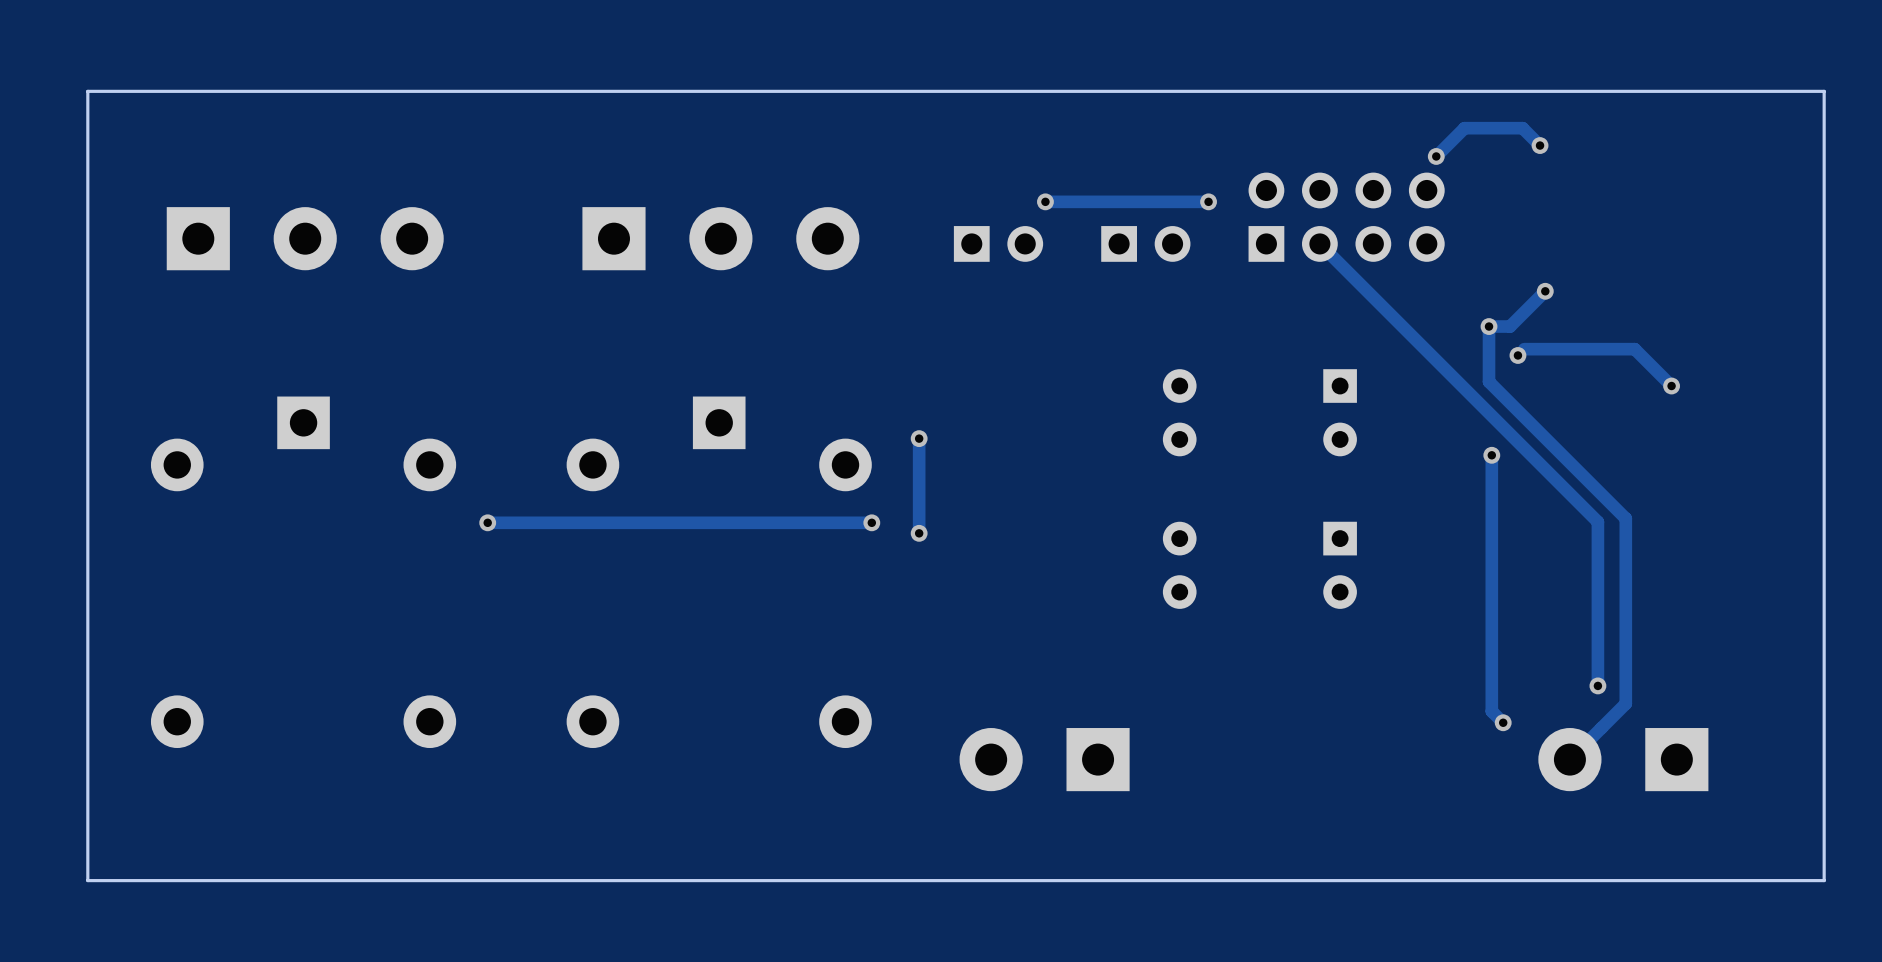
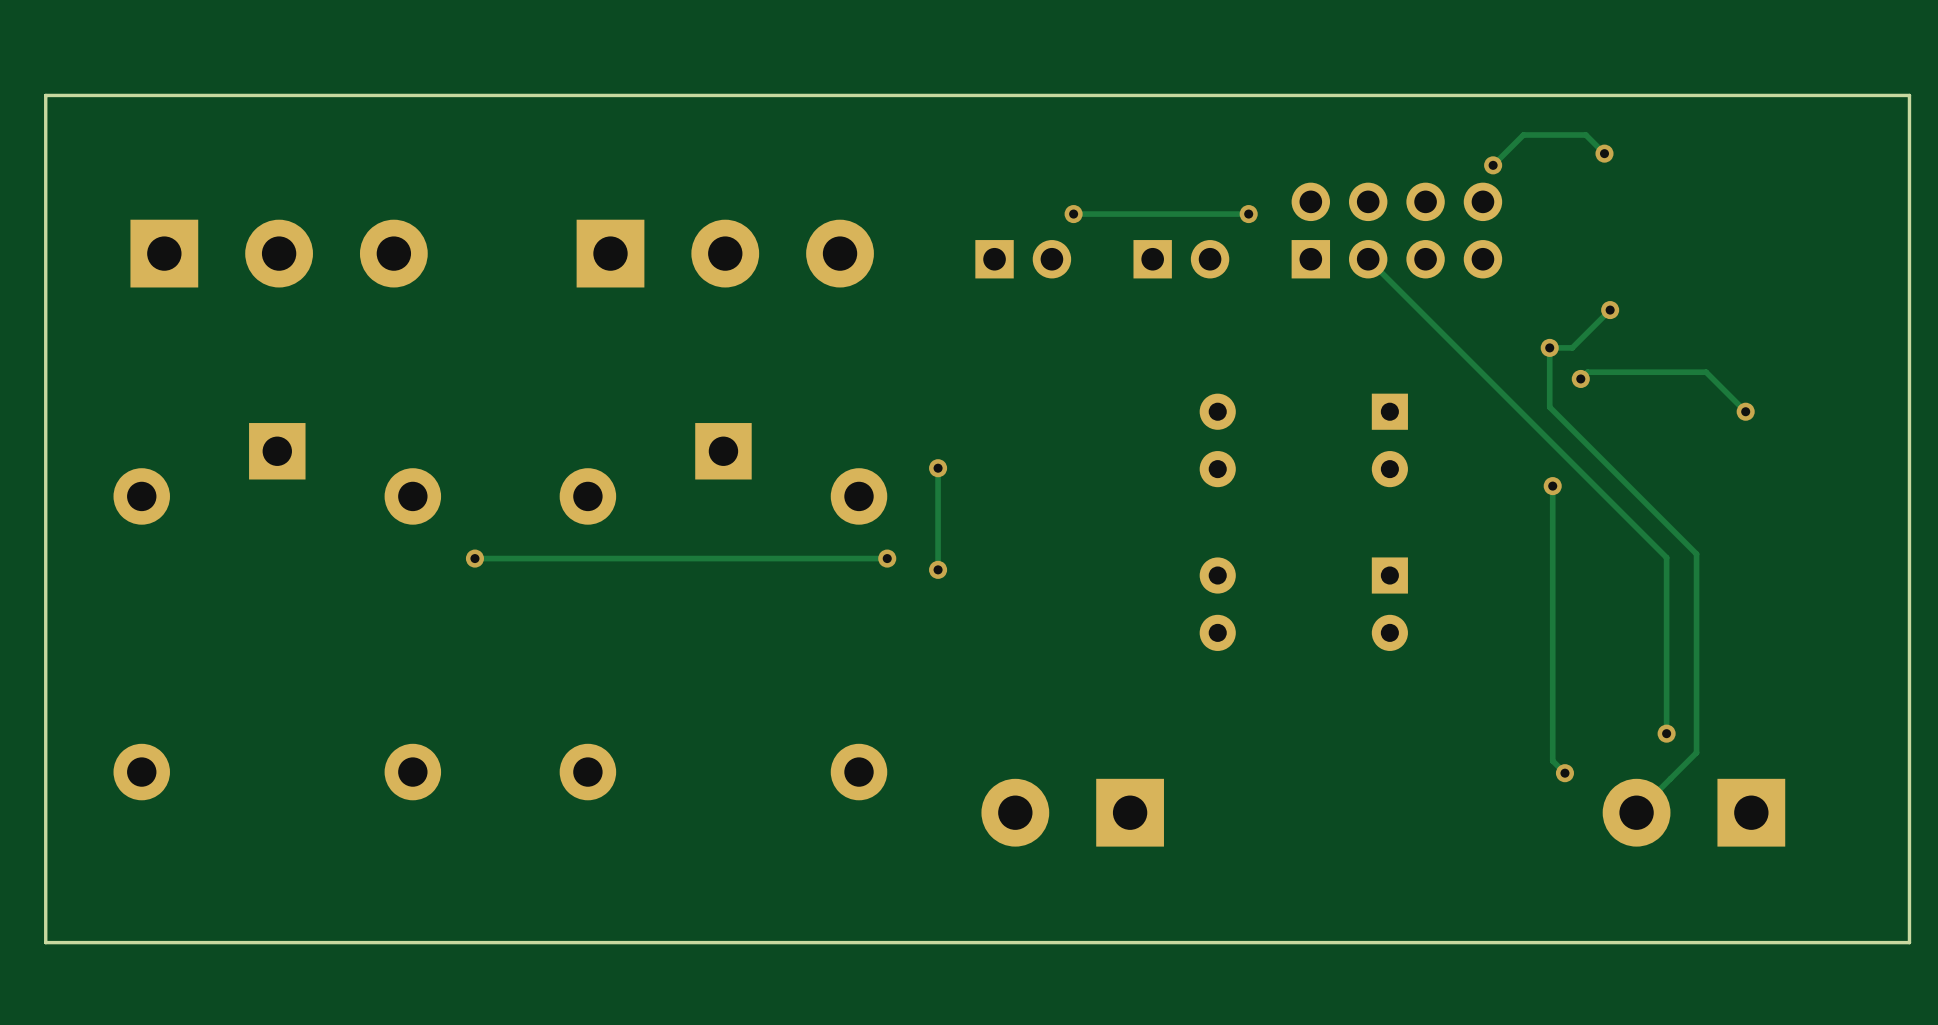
track width: thick (1540, 145) (1522, 128) (1464, 128) (1436, 156) -> thin (1604, 153) (1585, 134) (1523, 134) (1493, 165)
track width: thick (1208, 201) (1045, 201) -> thin (1248, 214) (1073, 214)
track width: thick (1319, 243) (1597, 521) (1597, 685) -> thin (1368, 259) (1666, 557) (1666, 733)
track width: thick (1545, 291) (1510, 326) (1489, 326) (1489, 381) (1625, 518) (1625, 703) (1569, 759) -> thin (1610, 310) (1572, 347) (1549, 347) (1549, 407) (1696, 554) (1696, 752) (1636, 812)
track width: thick (1524, 349) (1634, 349) (1671, 386) -> thin (1587, 372) (1706, 372) (1745, 411)
track width: thick (919, 438) (919, 533) -> thin (938, 468) (938, 569)
track width: thick (1491, 455) (1491, 711) (1503, 722) -> thin (1552, 486) (1552, 760) (1564, 773)
track width: thick (871, 522) (487, 522) -> thin (887, 558) (474, 558)

